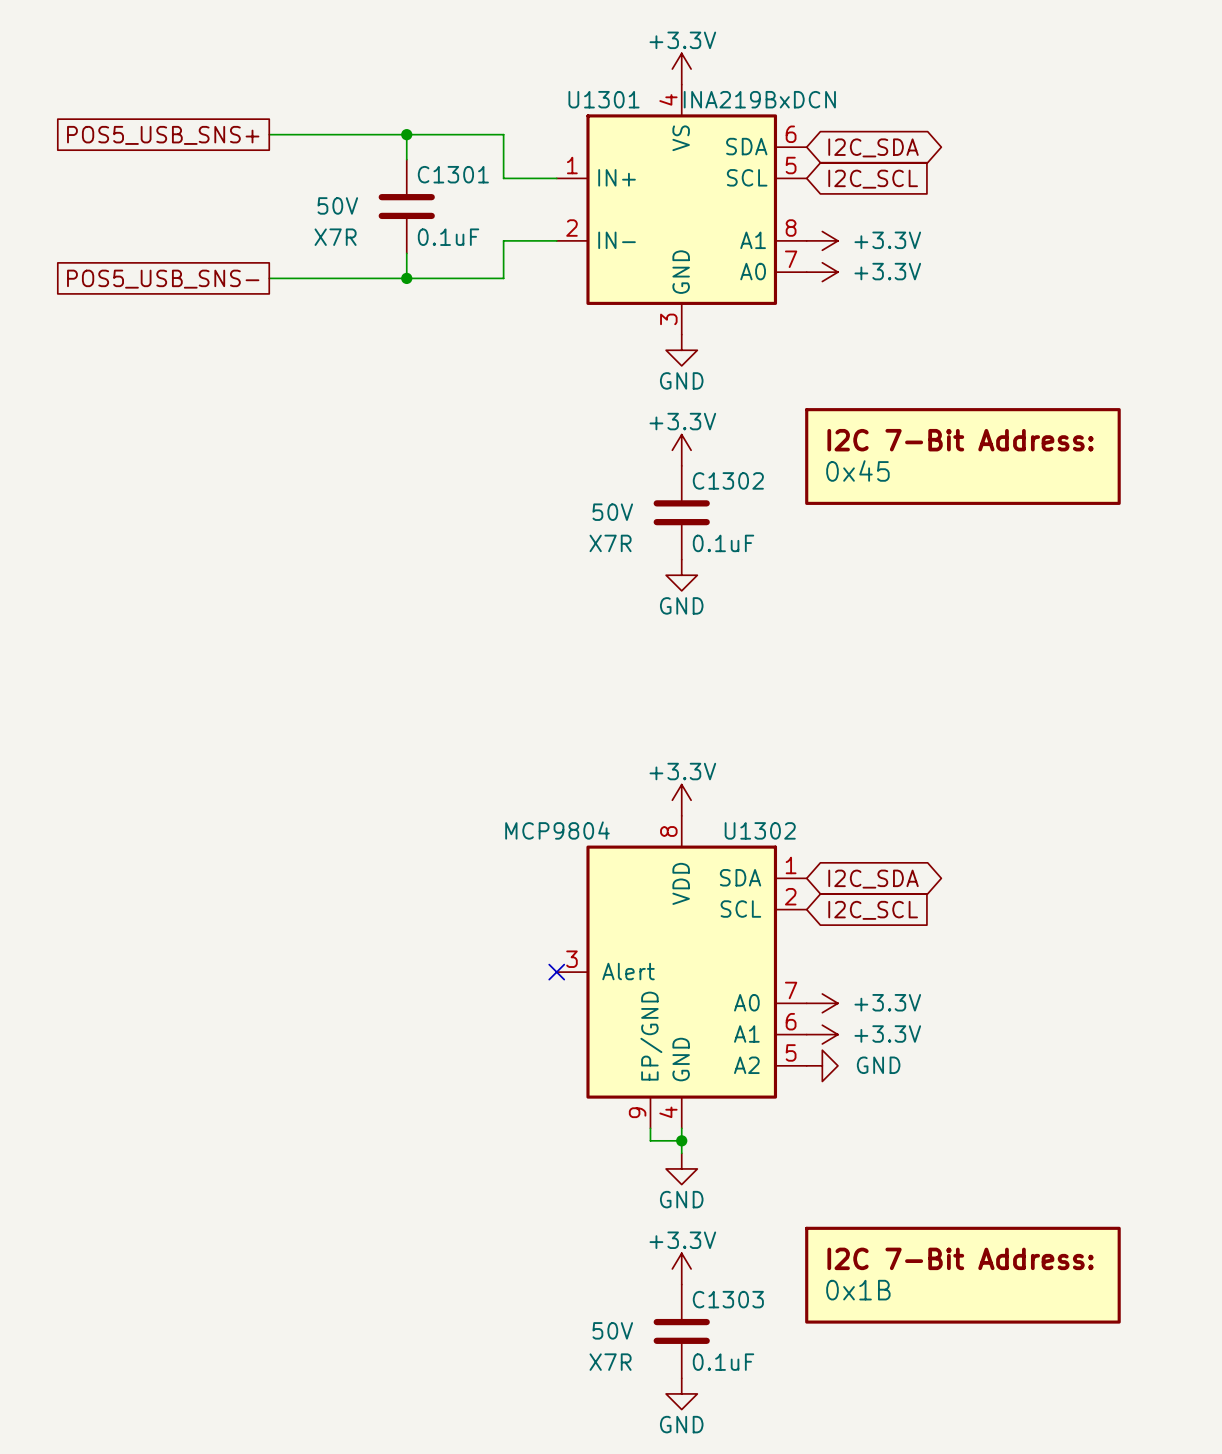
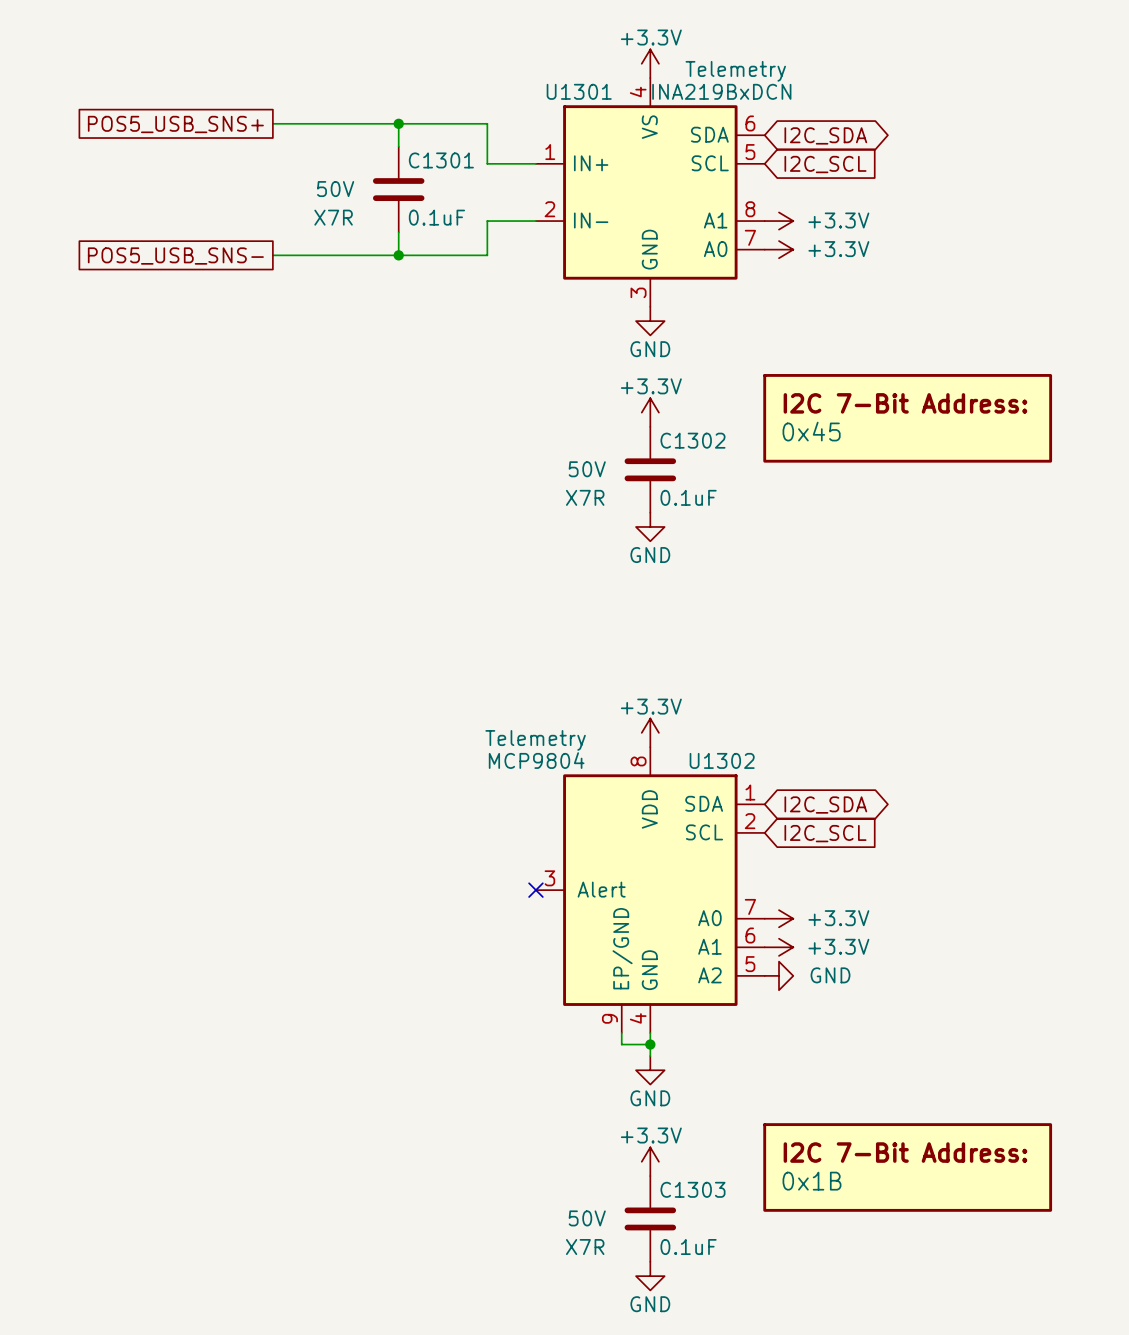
U1301 text: none -> Telemetry (735, 71)
U1302 text: none -> Telemetry (535, 740)

